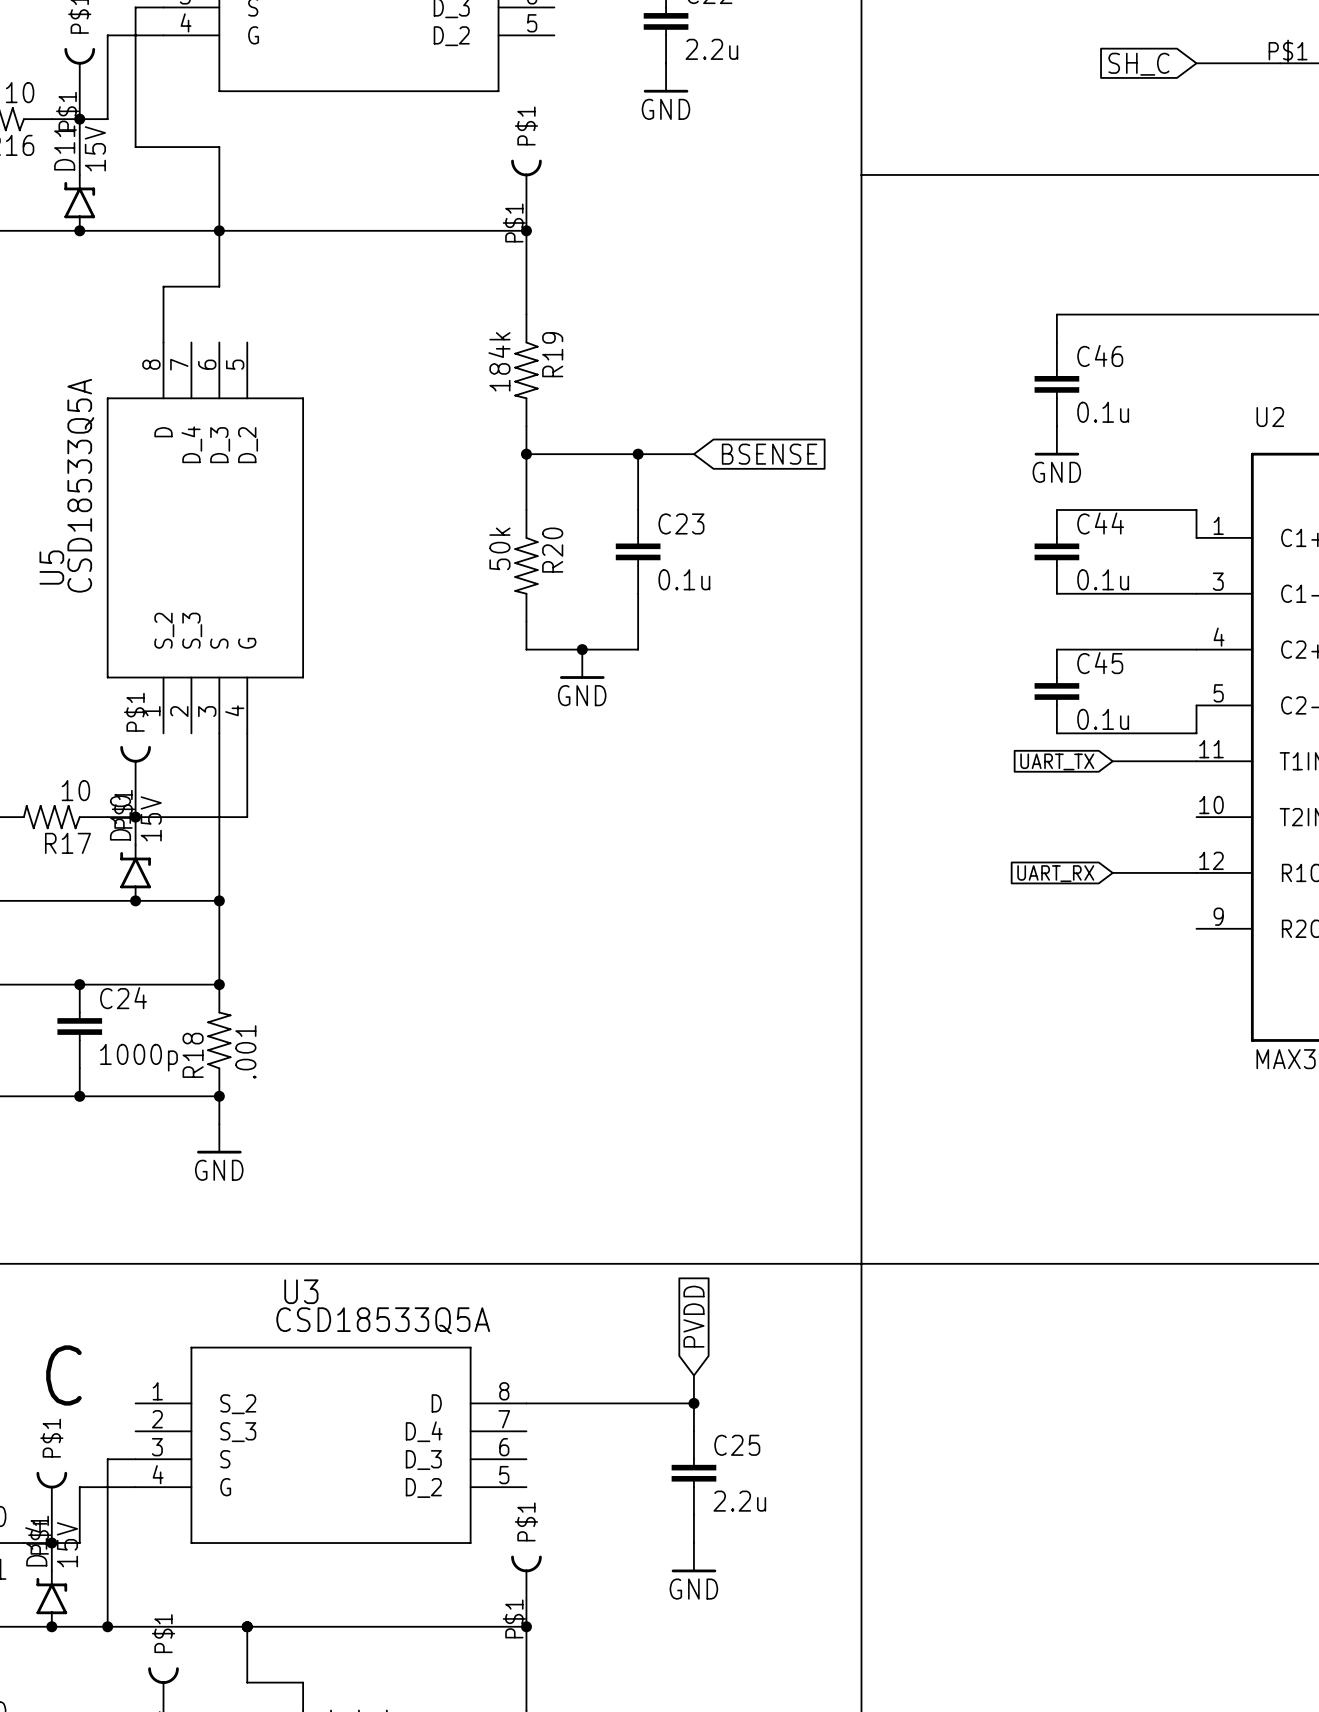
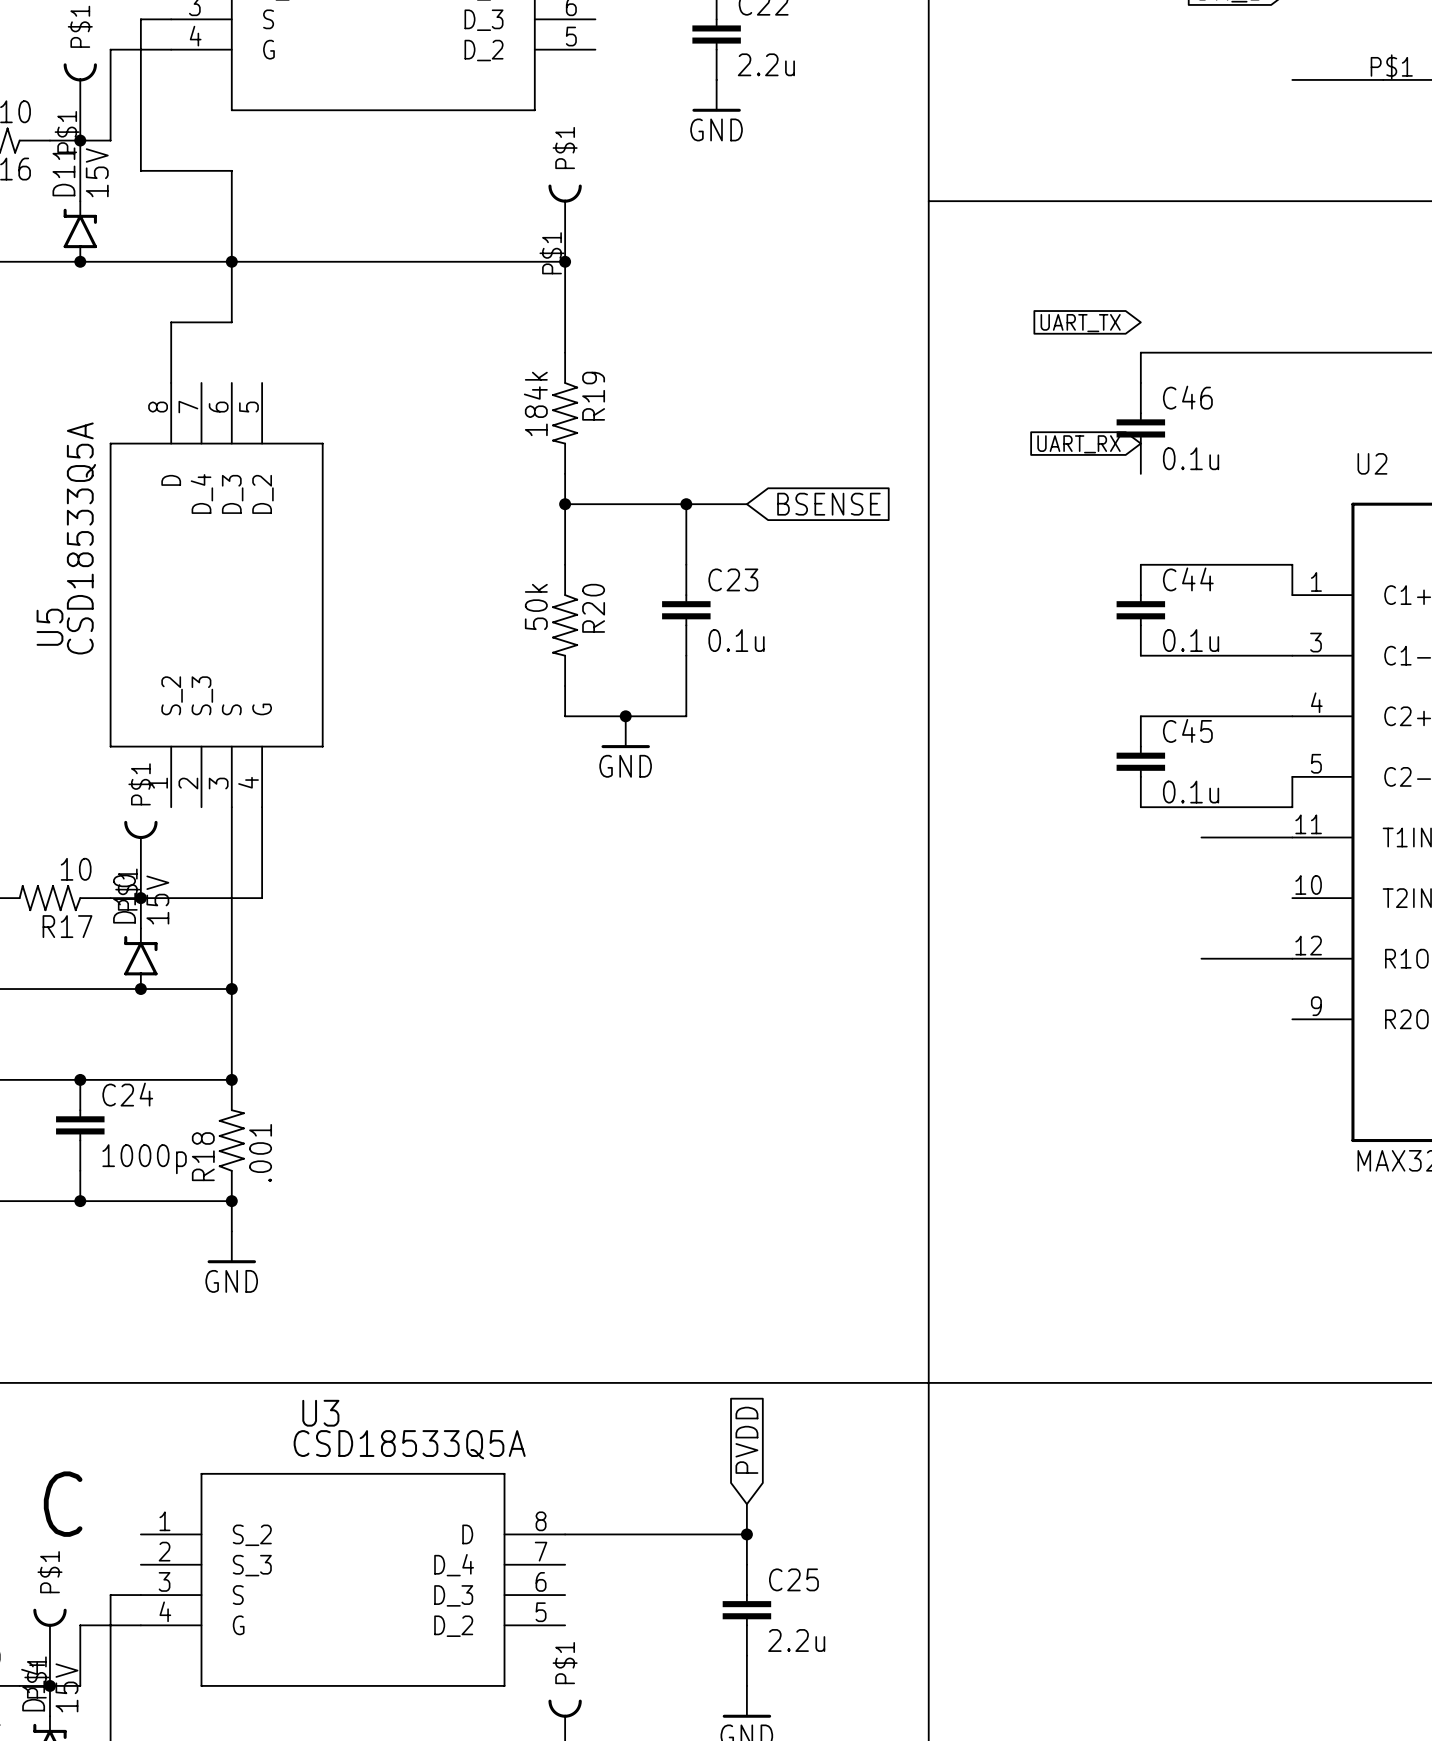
global label: SH_C (1138, 64) -> none
global label: none -> UART_TX (1080, 323)
global label: none -> UART_RX (1079, 444)
power symbol: GND (1056, 440) -> none
global label: UART_TX (1057, 761) -> none
global label: UART_RX (1055, 873) -> none

